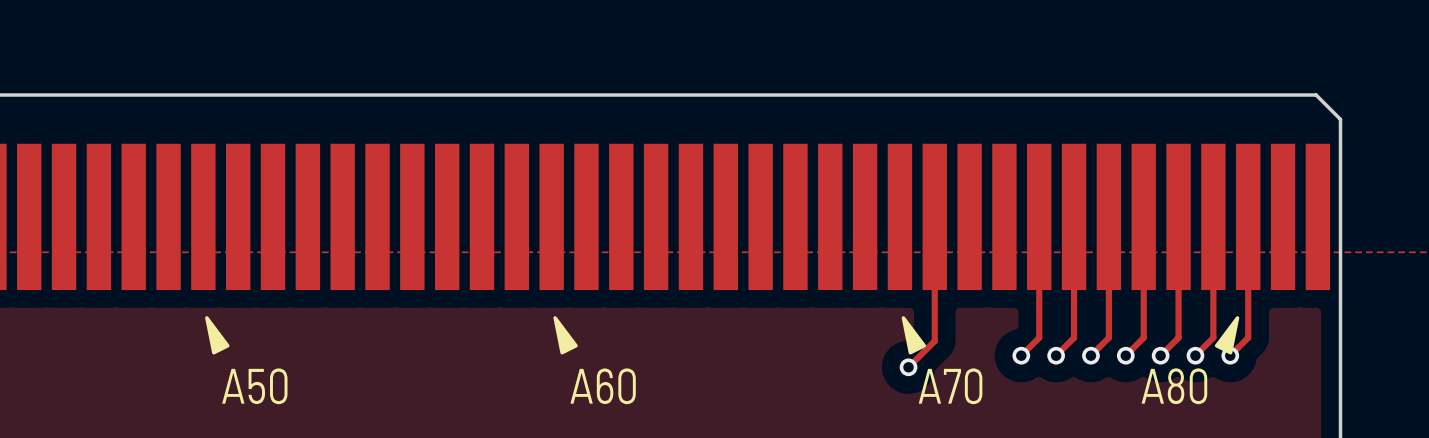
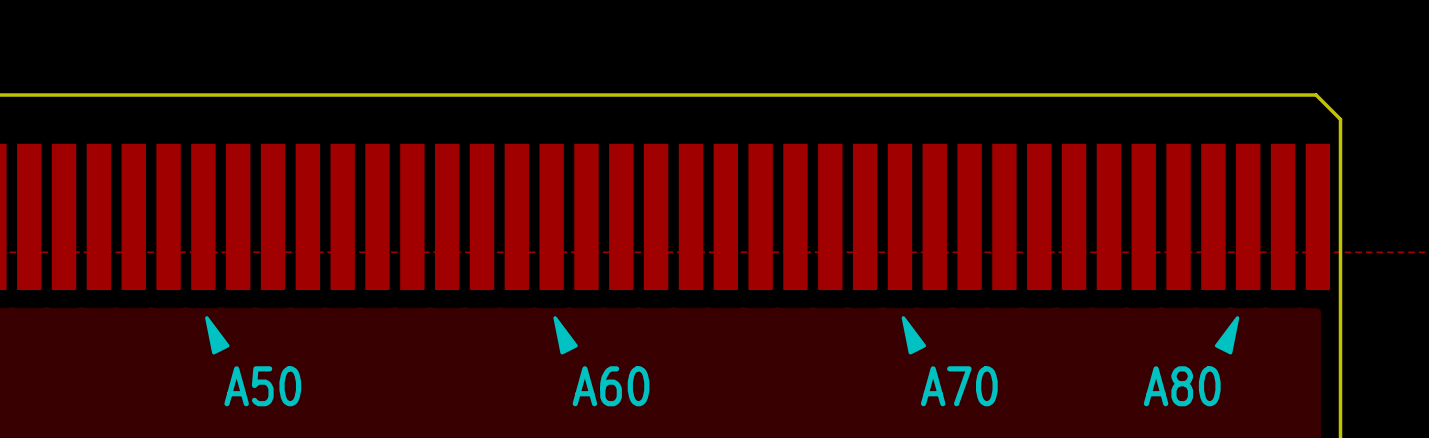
track: (934, 216) (934, 341) (908, 367) -> none
track: (1039, 216) (1039, 337) (1019, 357) -> none
track: (1074, 216) (1074, 337) (1056, 355) -> none
track: (1108, 216) (1108, 337) (1090, 355) -> none
track: (1143, 216) (1143, 337) (1125, 355) -> none
track: (1178, 216) (1178, 337) (1160, 355) -> none
track: (1213, 216) (1213, 337) (1195, 355) -> none
track: (1248, 216) (1248, 337) (1230, 355) -> none
via: (1021, 355) -> none
via: (1056, 355) -> none
via: (1090, 355) -> none
via: (1125, 355) -> none
via: (1160, 355) -> none
via: (1195, 355) -> none
via: (1230, 355) -> none
via: (908, 367) -> none

